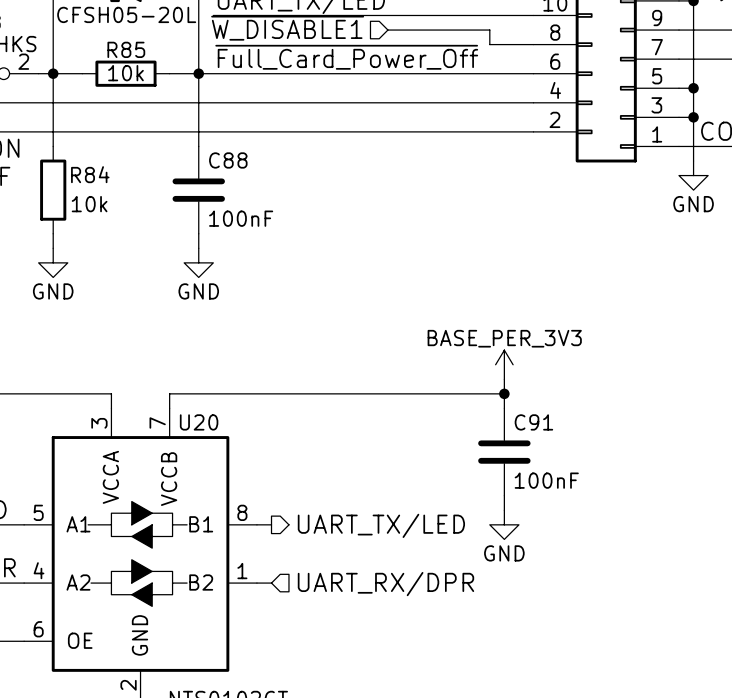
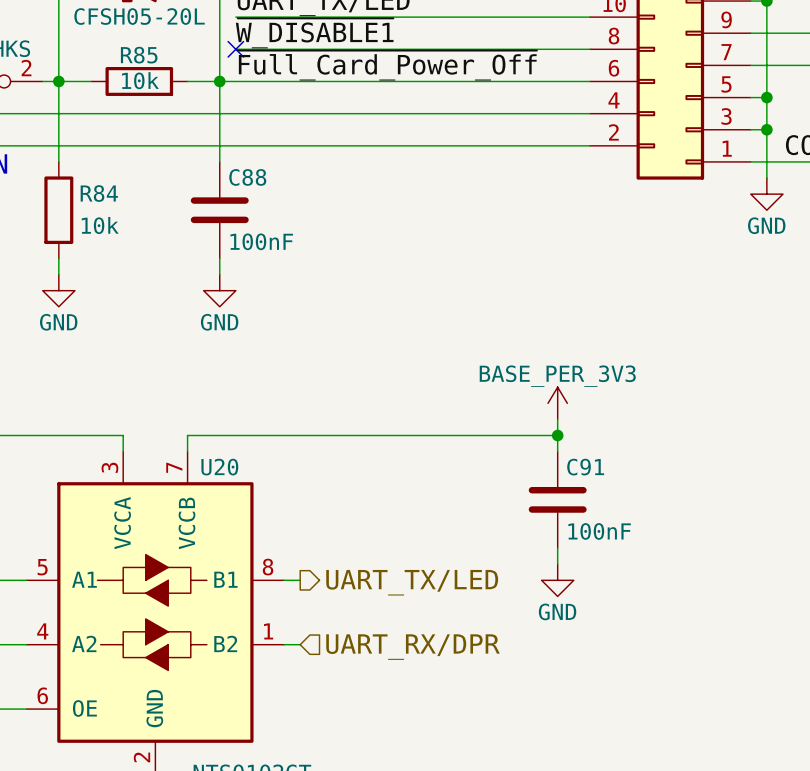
hierarchical label: ~{W_DISABLE1} (287, 28) -> none
label: none -> ~{W_DISABLE1} (314, 33)
wire: (387, 30) (489, 30) (489, 44) -> (235, 49) (541, 49)
no-connect mark: none -> (235, 49)

